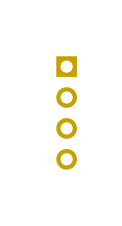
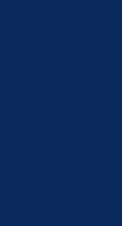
part: (66, 112) -> none

